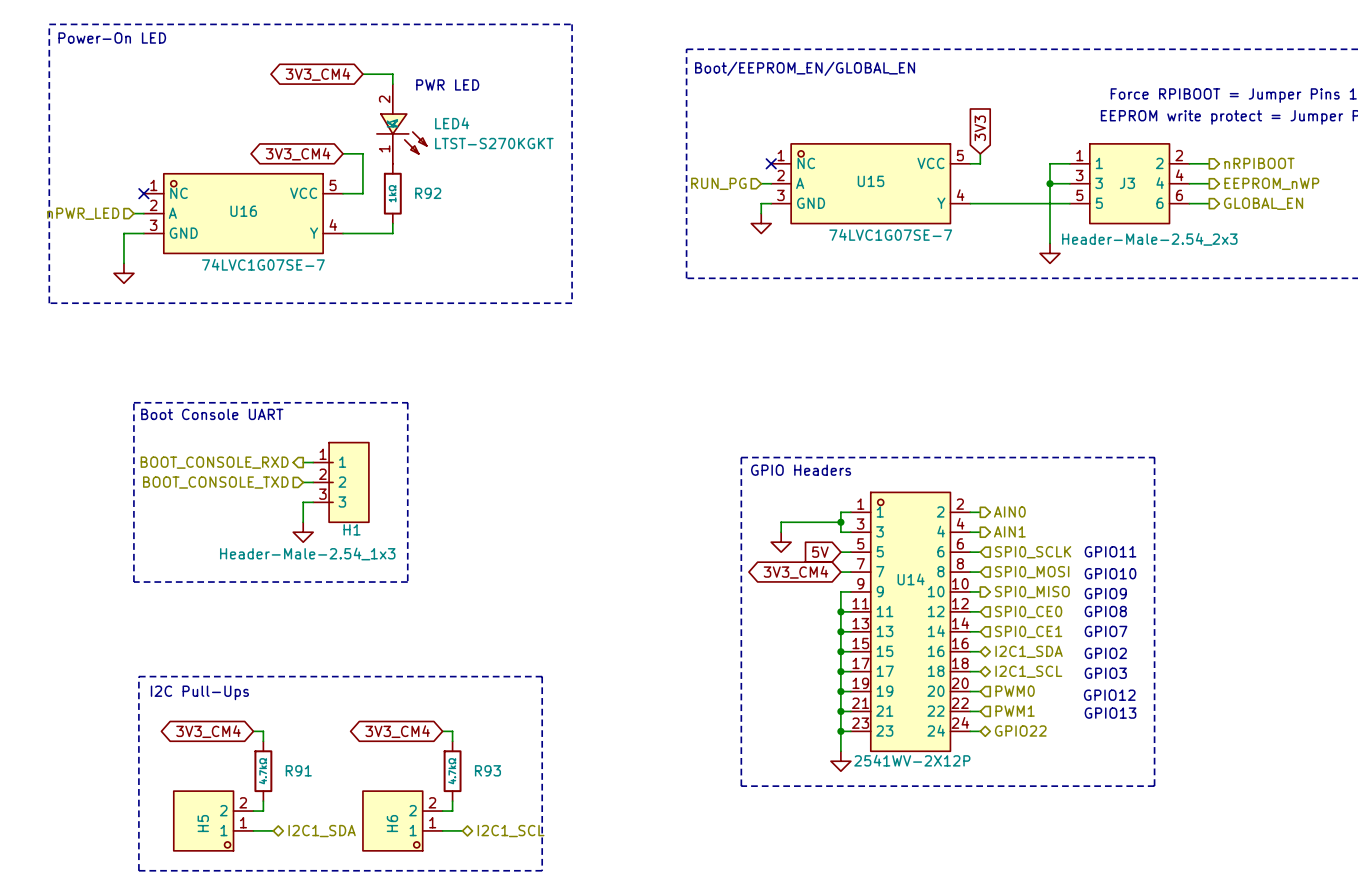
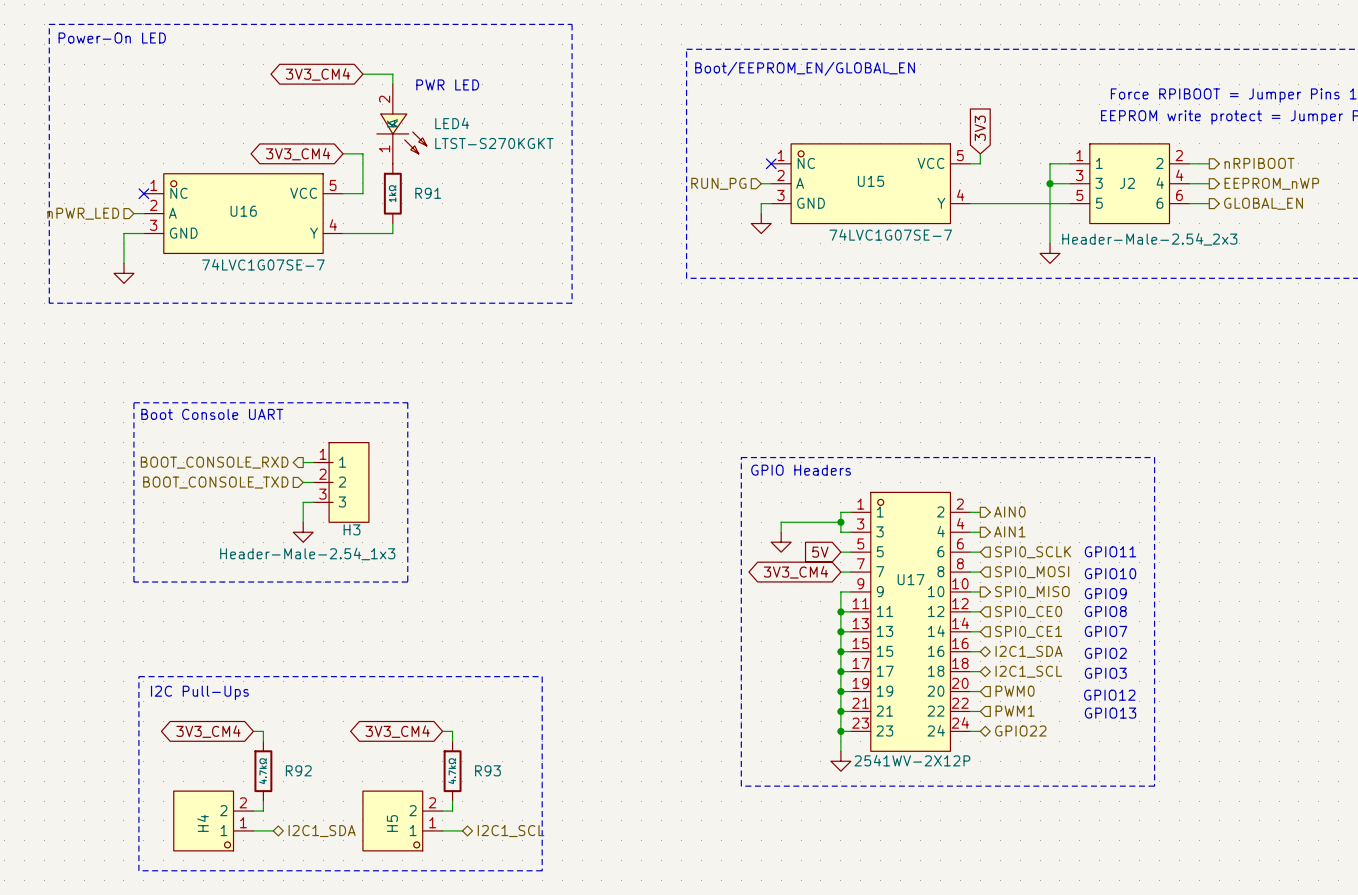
J3 name: J3 (1127, 183) -> J2 (1127, 183)
R92 name: R92 (428, 193) -> R91 (428, 193)
H1 name: H1 (352, 529) -> H3 (352, 529)
U14 name: U14 (911, 579) -> U17 (911, 579)
R91 name: R91 (298, 770) -> R92 (298, 770)
H5 name: H5 (203, 823) -> H4 (203, 823)
H6 name: H6 (392, 823) -> H5 (392, 823)

